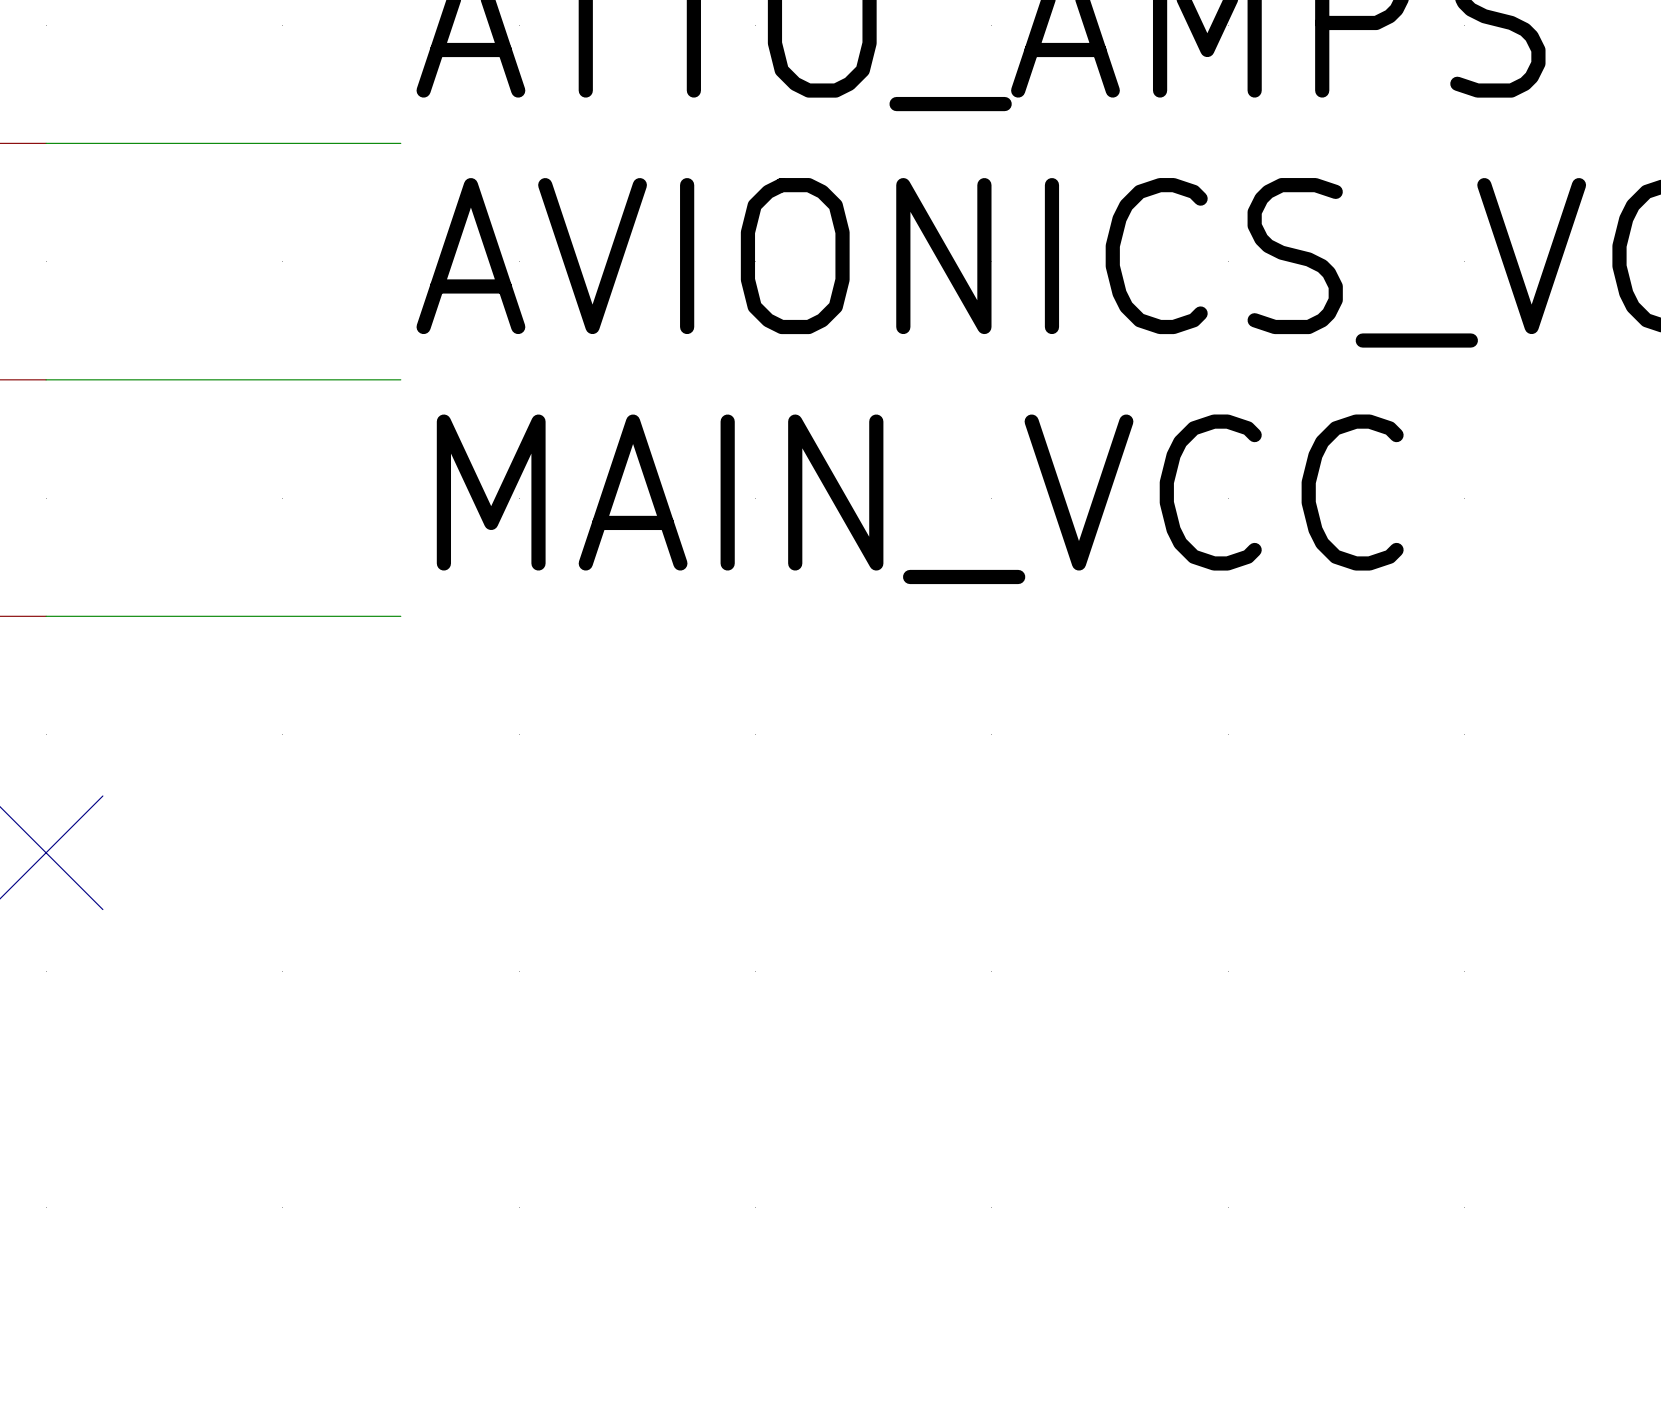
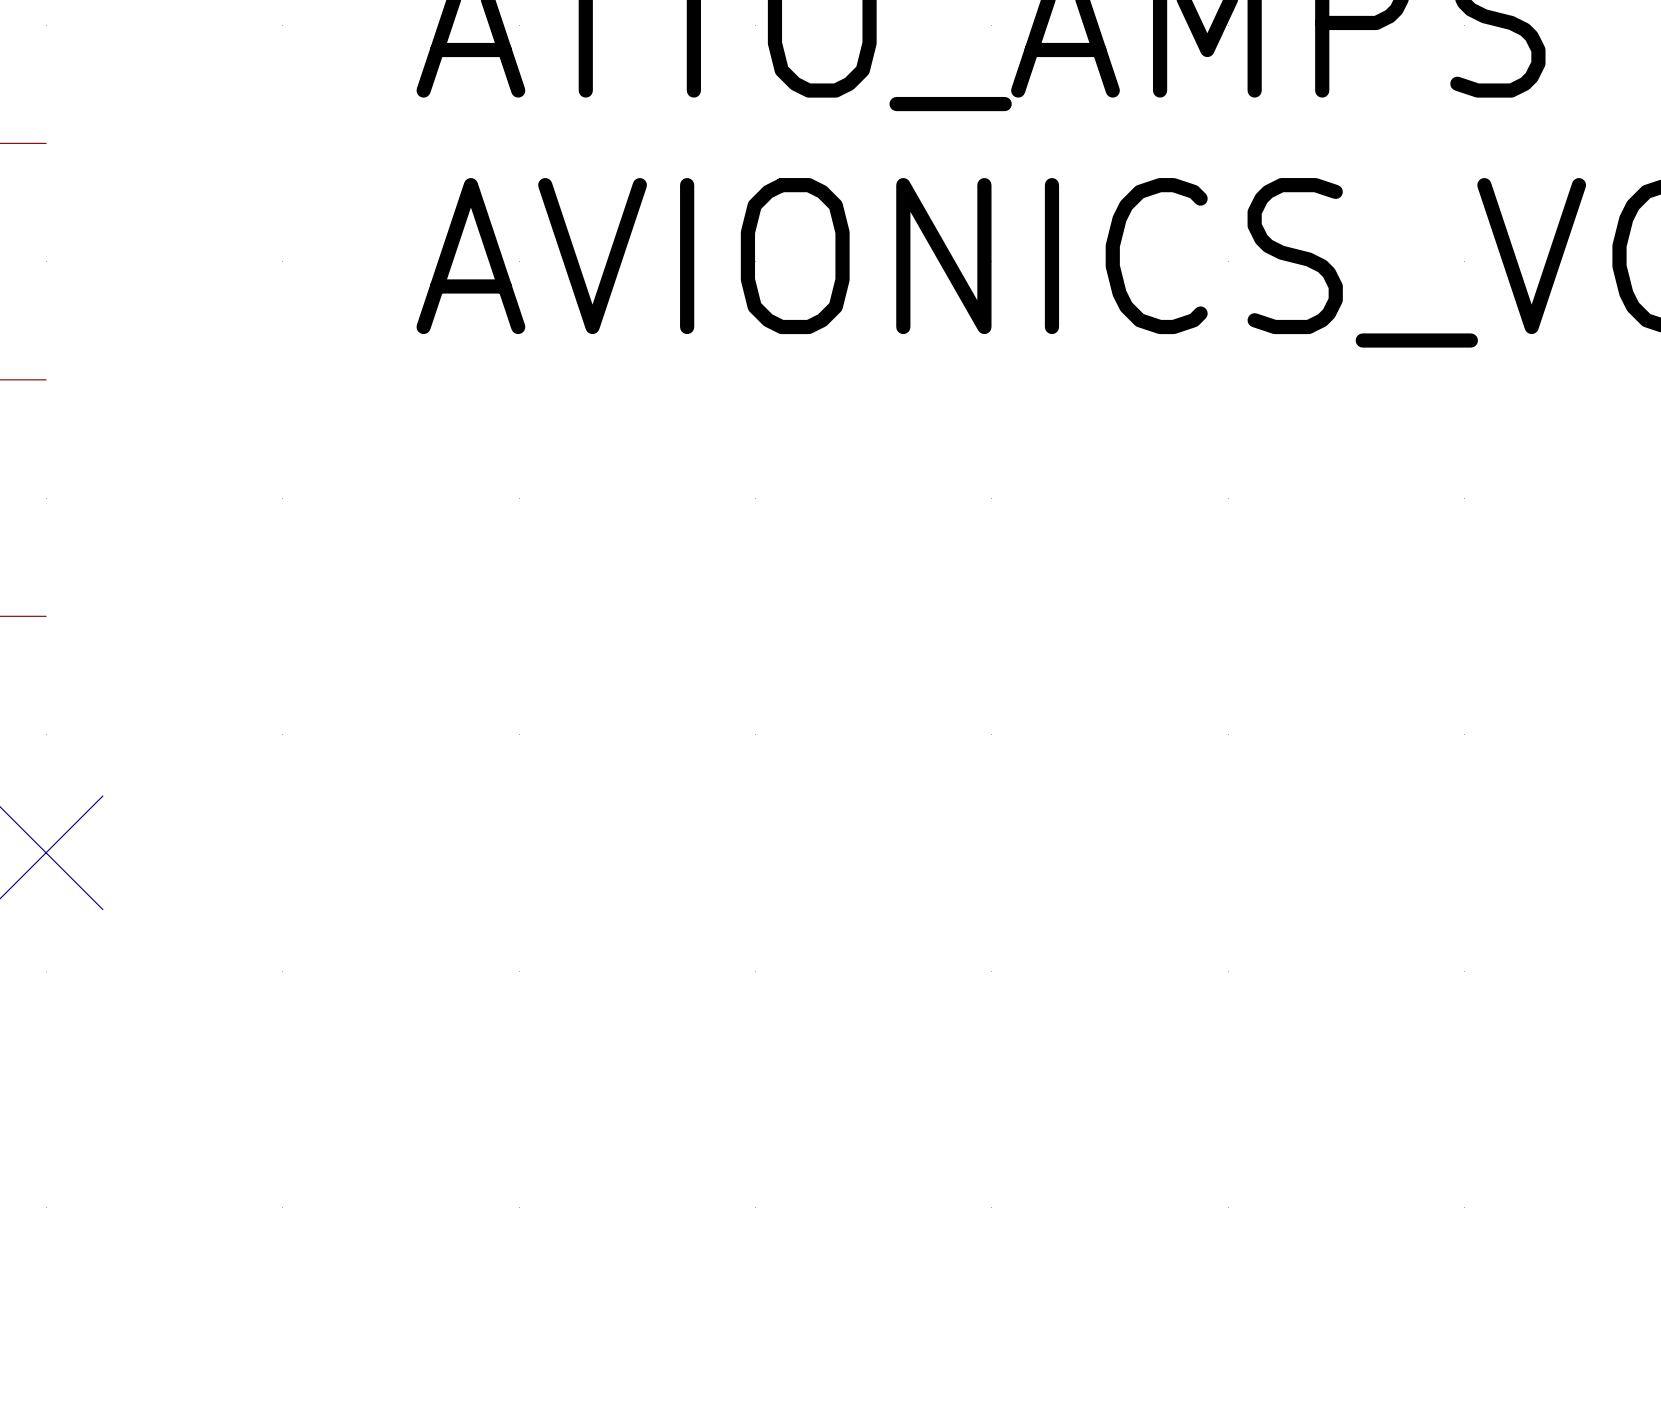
wire: (46, 143) (400, 143) -> none
wire: (46, 379) (400, 379) -> none
label: MAIN_VCC (920, 499) -> none
wire: (46, 616) (400, 616) -> none

